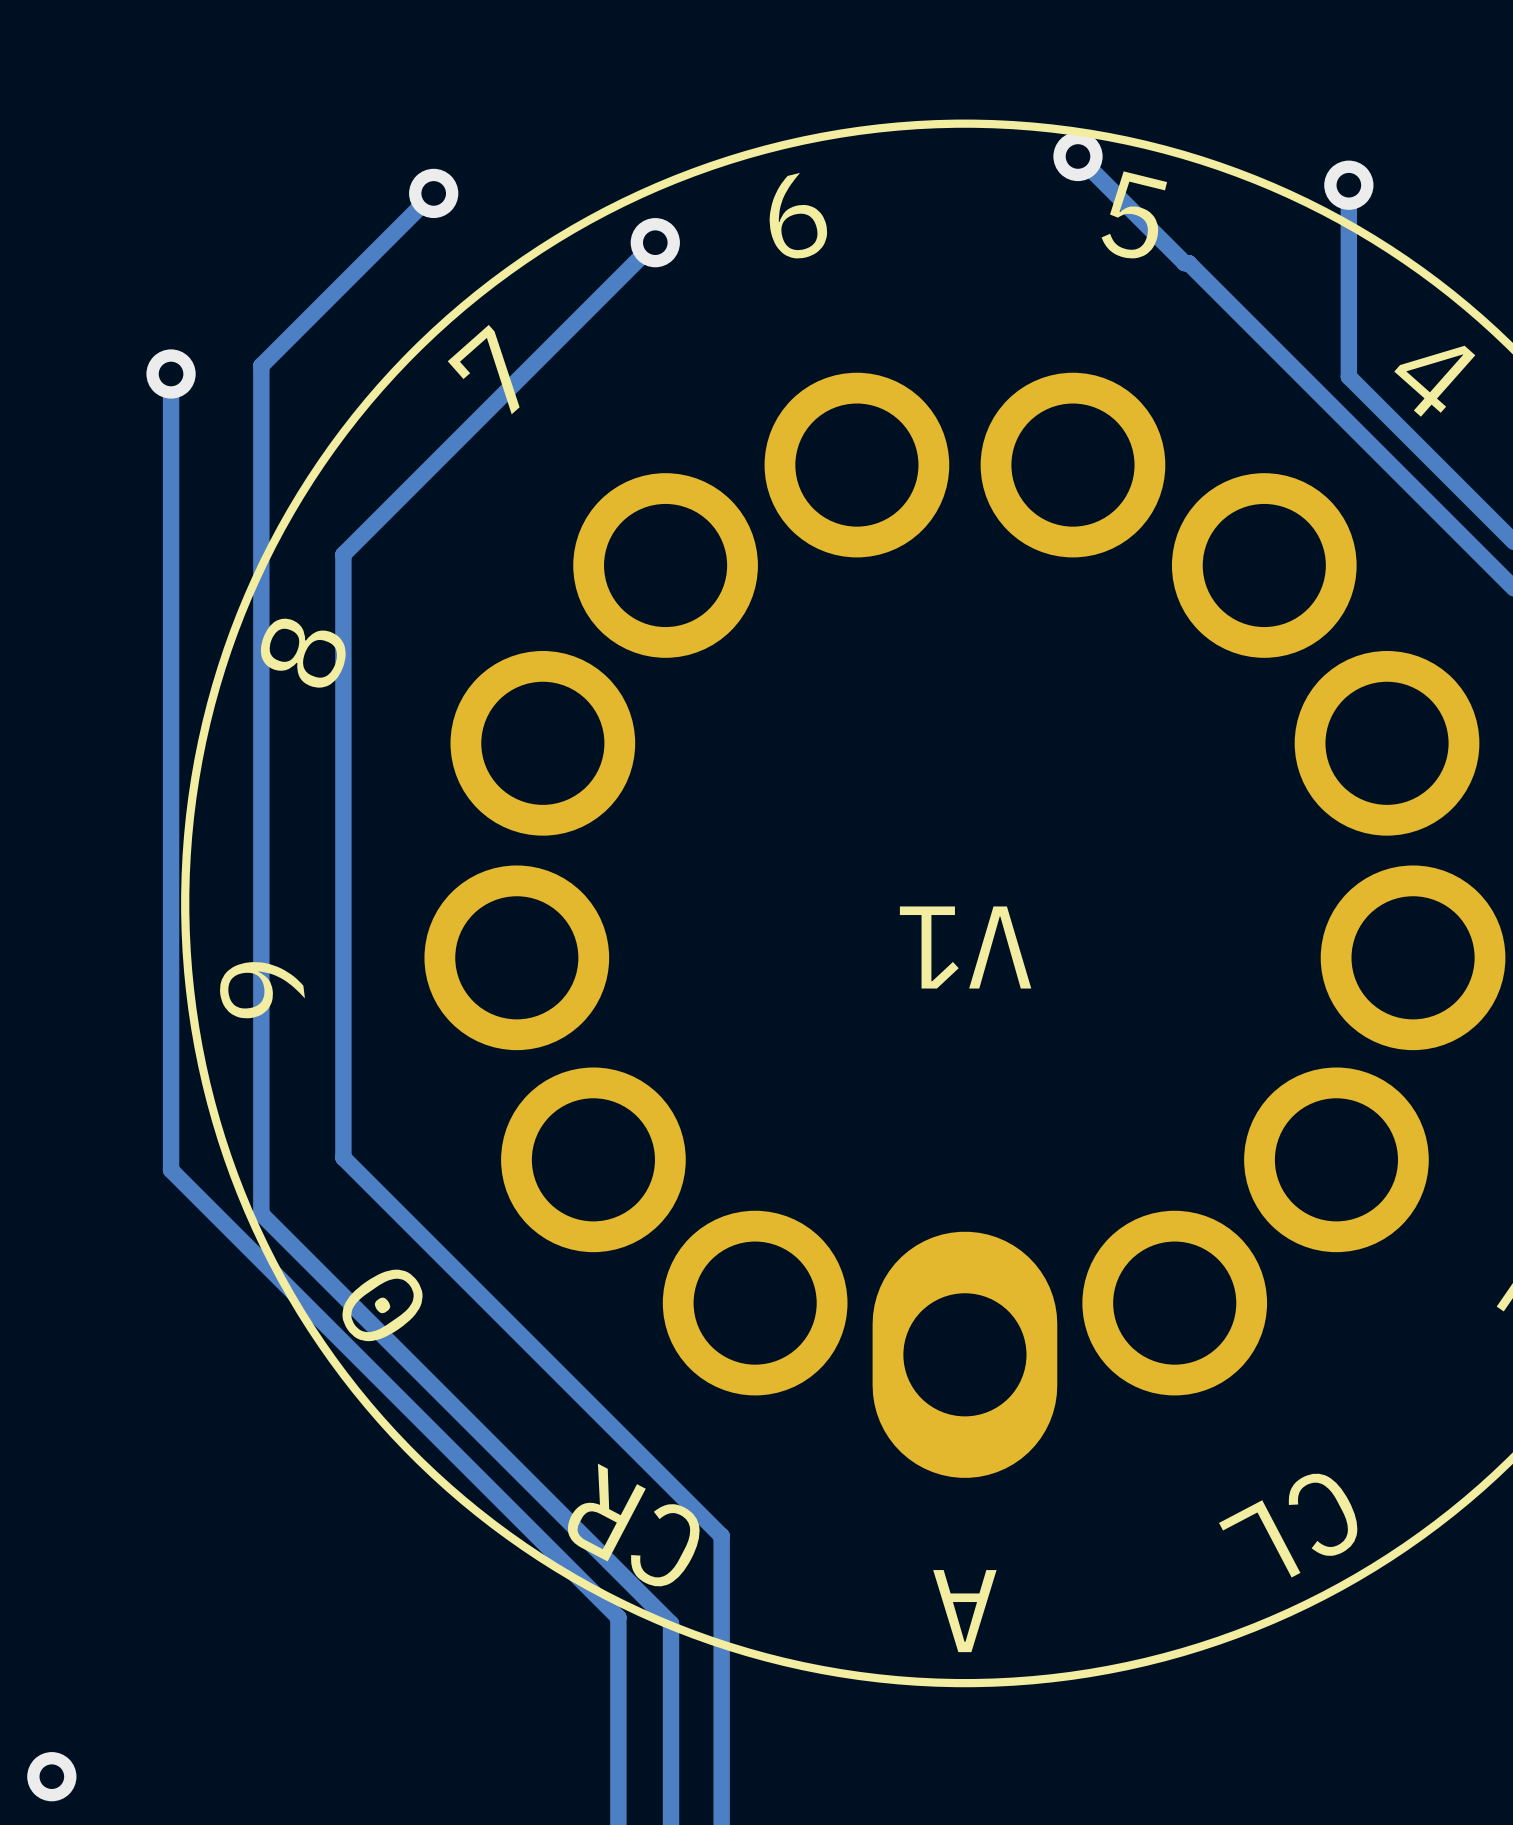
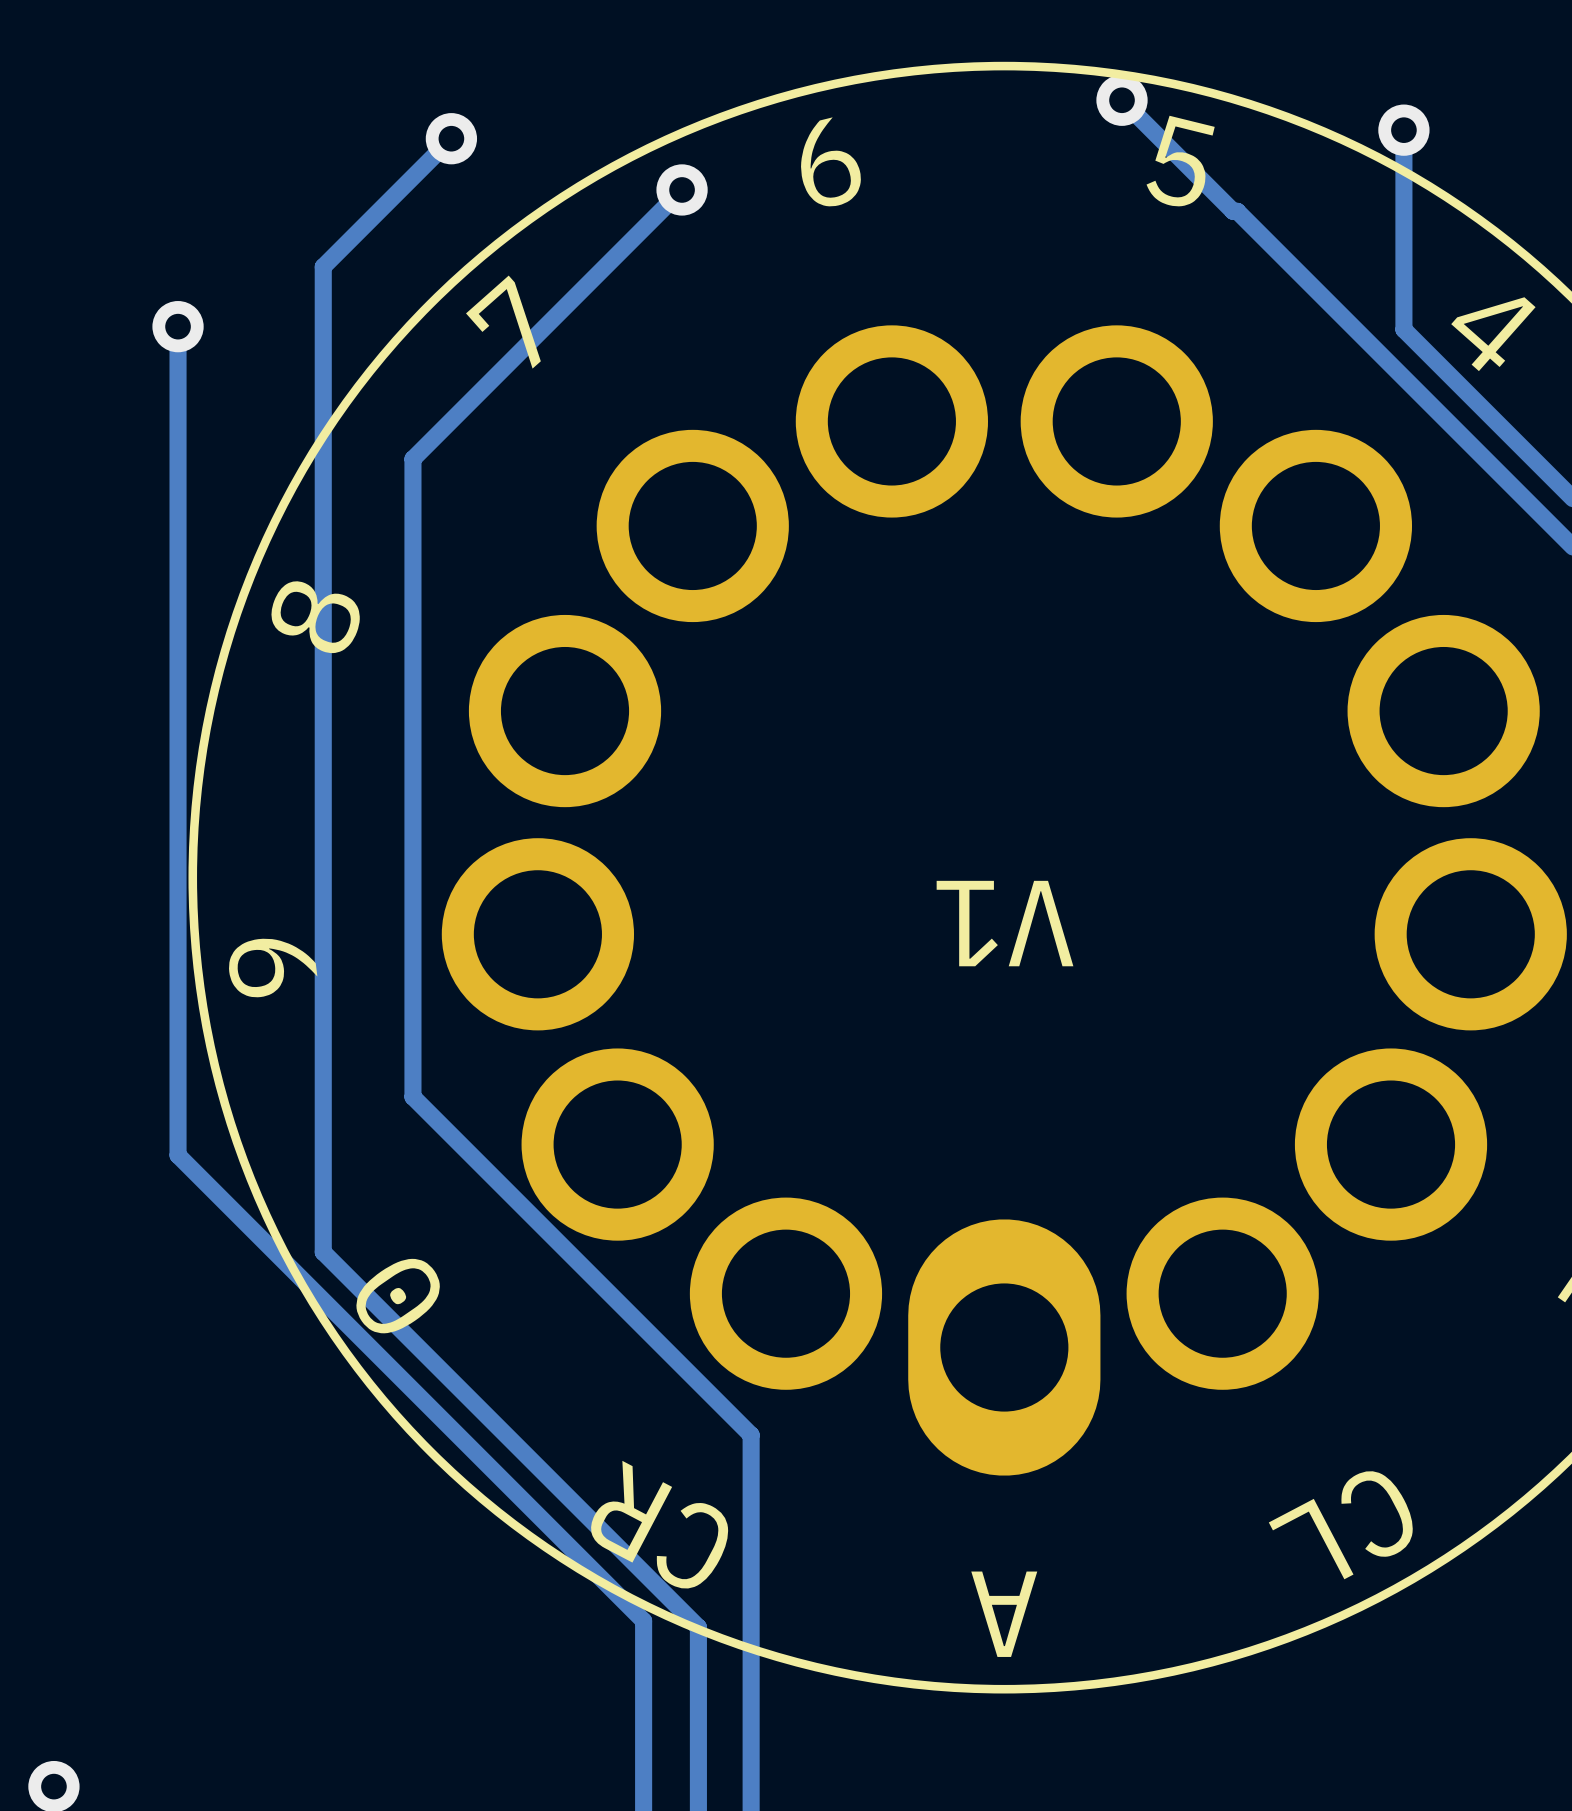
track: (310, 316) (261, 365) (261, 1213) (310, 1263) -> (323, 266) (323, 1252)
track: (396, 501) (343, 554) (343, 1157) (721, 1536) -> (412, 459) (412, 1096) (751, 1435) (751, 1536)

